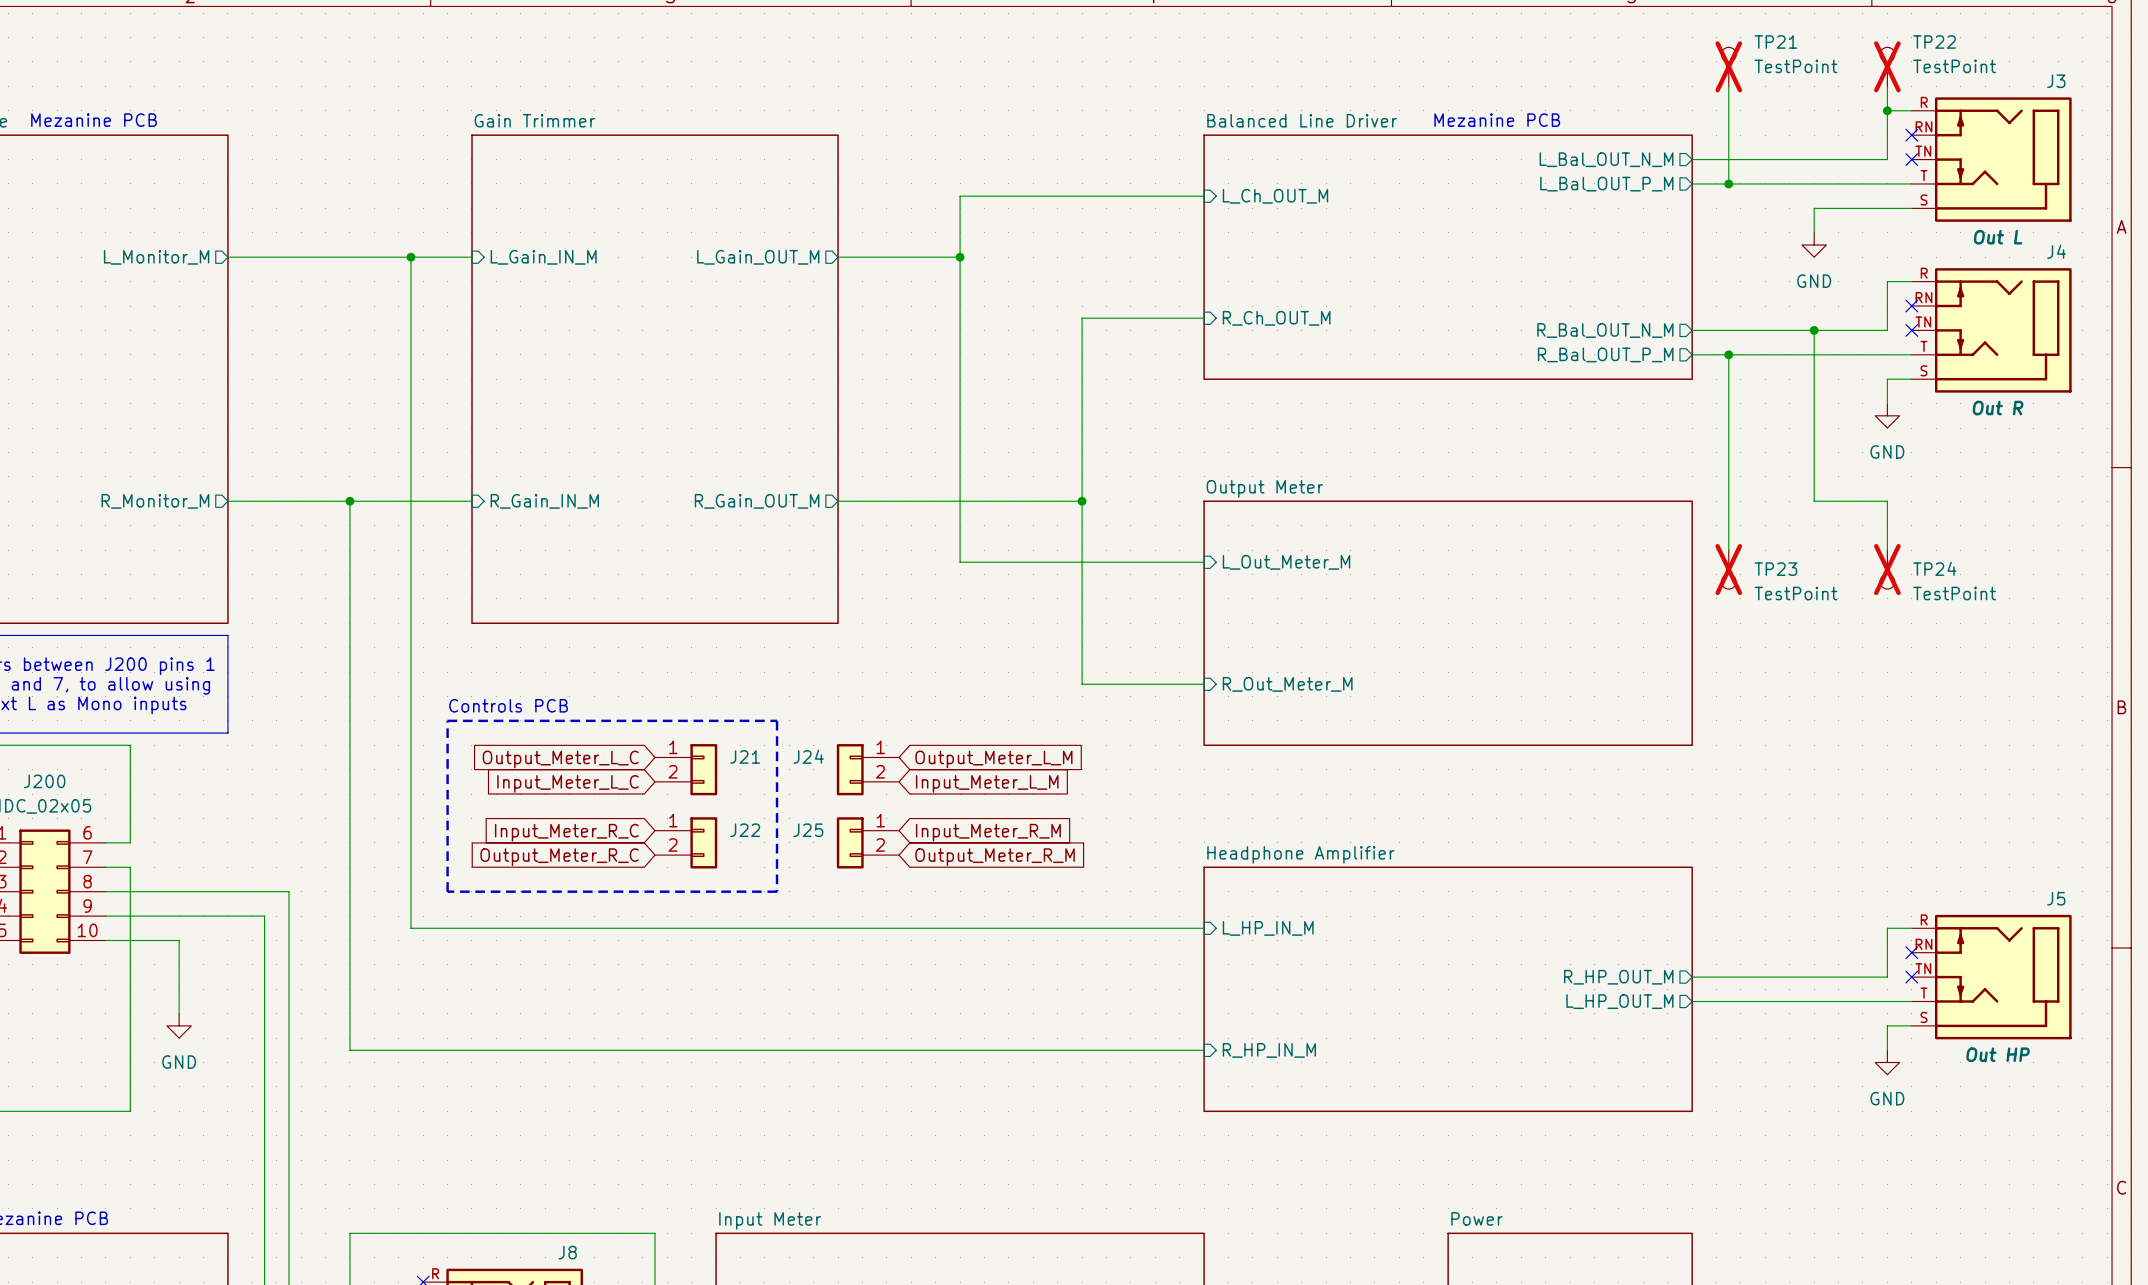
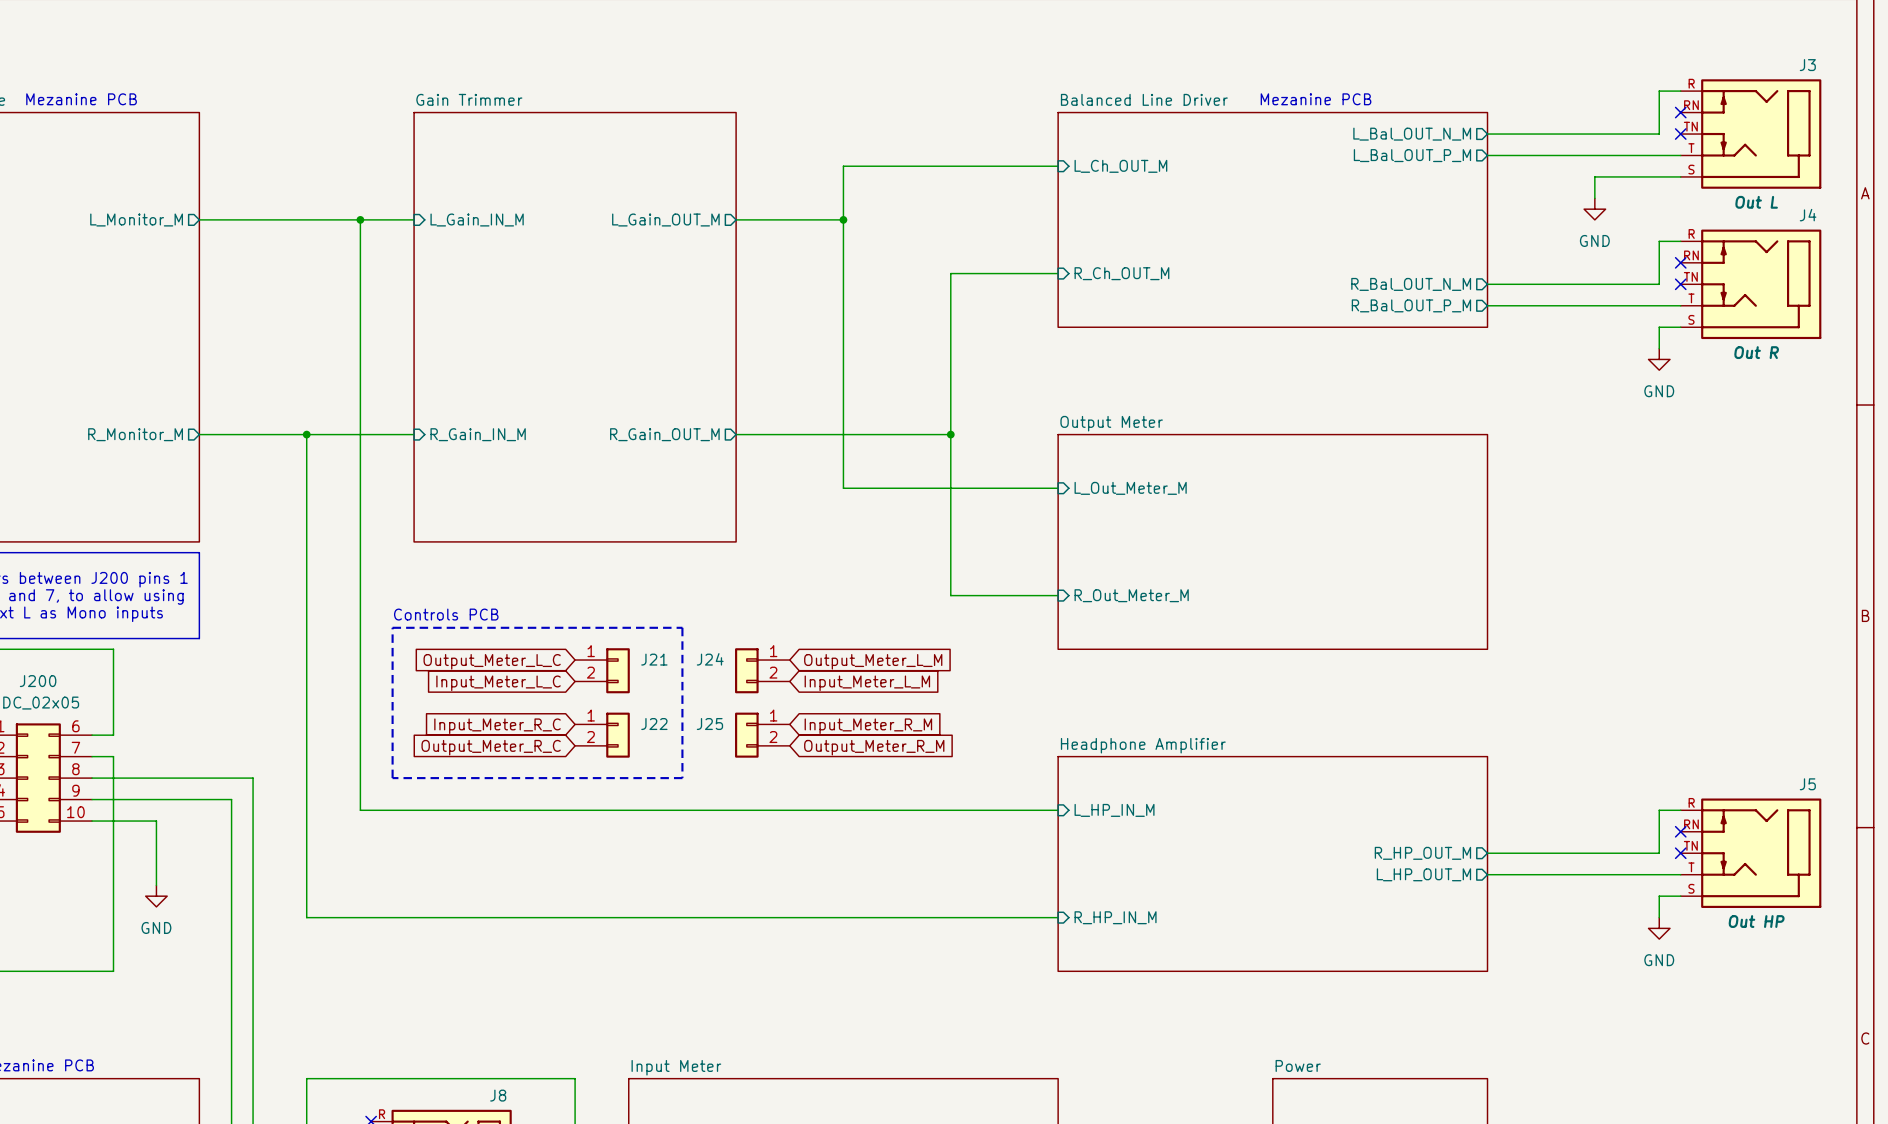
TP21: TestPoint (1728, 66) -> none
TP22: TestPoint (1887, 66) -> none
wire: (1728, 86) (1728, 183) -> none
wire: (1887, 86) (1887, 110) -> none
junction: (1887, 110) -> none
junction: (1728, 183) -> none
wire: (1814, 330) (1814, 501) (1887, 501) (1887, 550) -> none
junction: (1814, 330) -> none
wire: (1728, 354) (1728, 550) -> none
junction: (1728, 354) -> none
TP23: TestPoint (1728, 569) -> none
TP24: TestPoint (1887, 569) -> none

